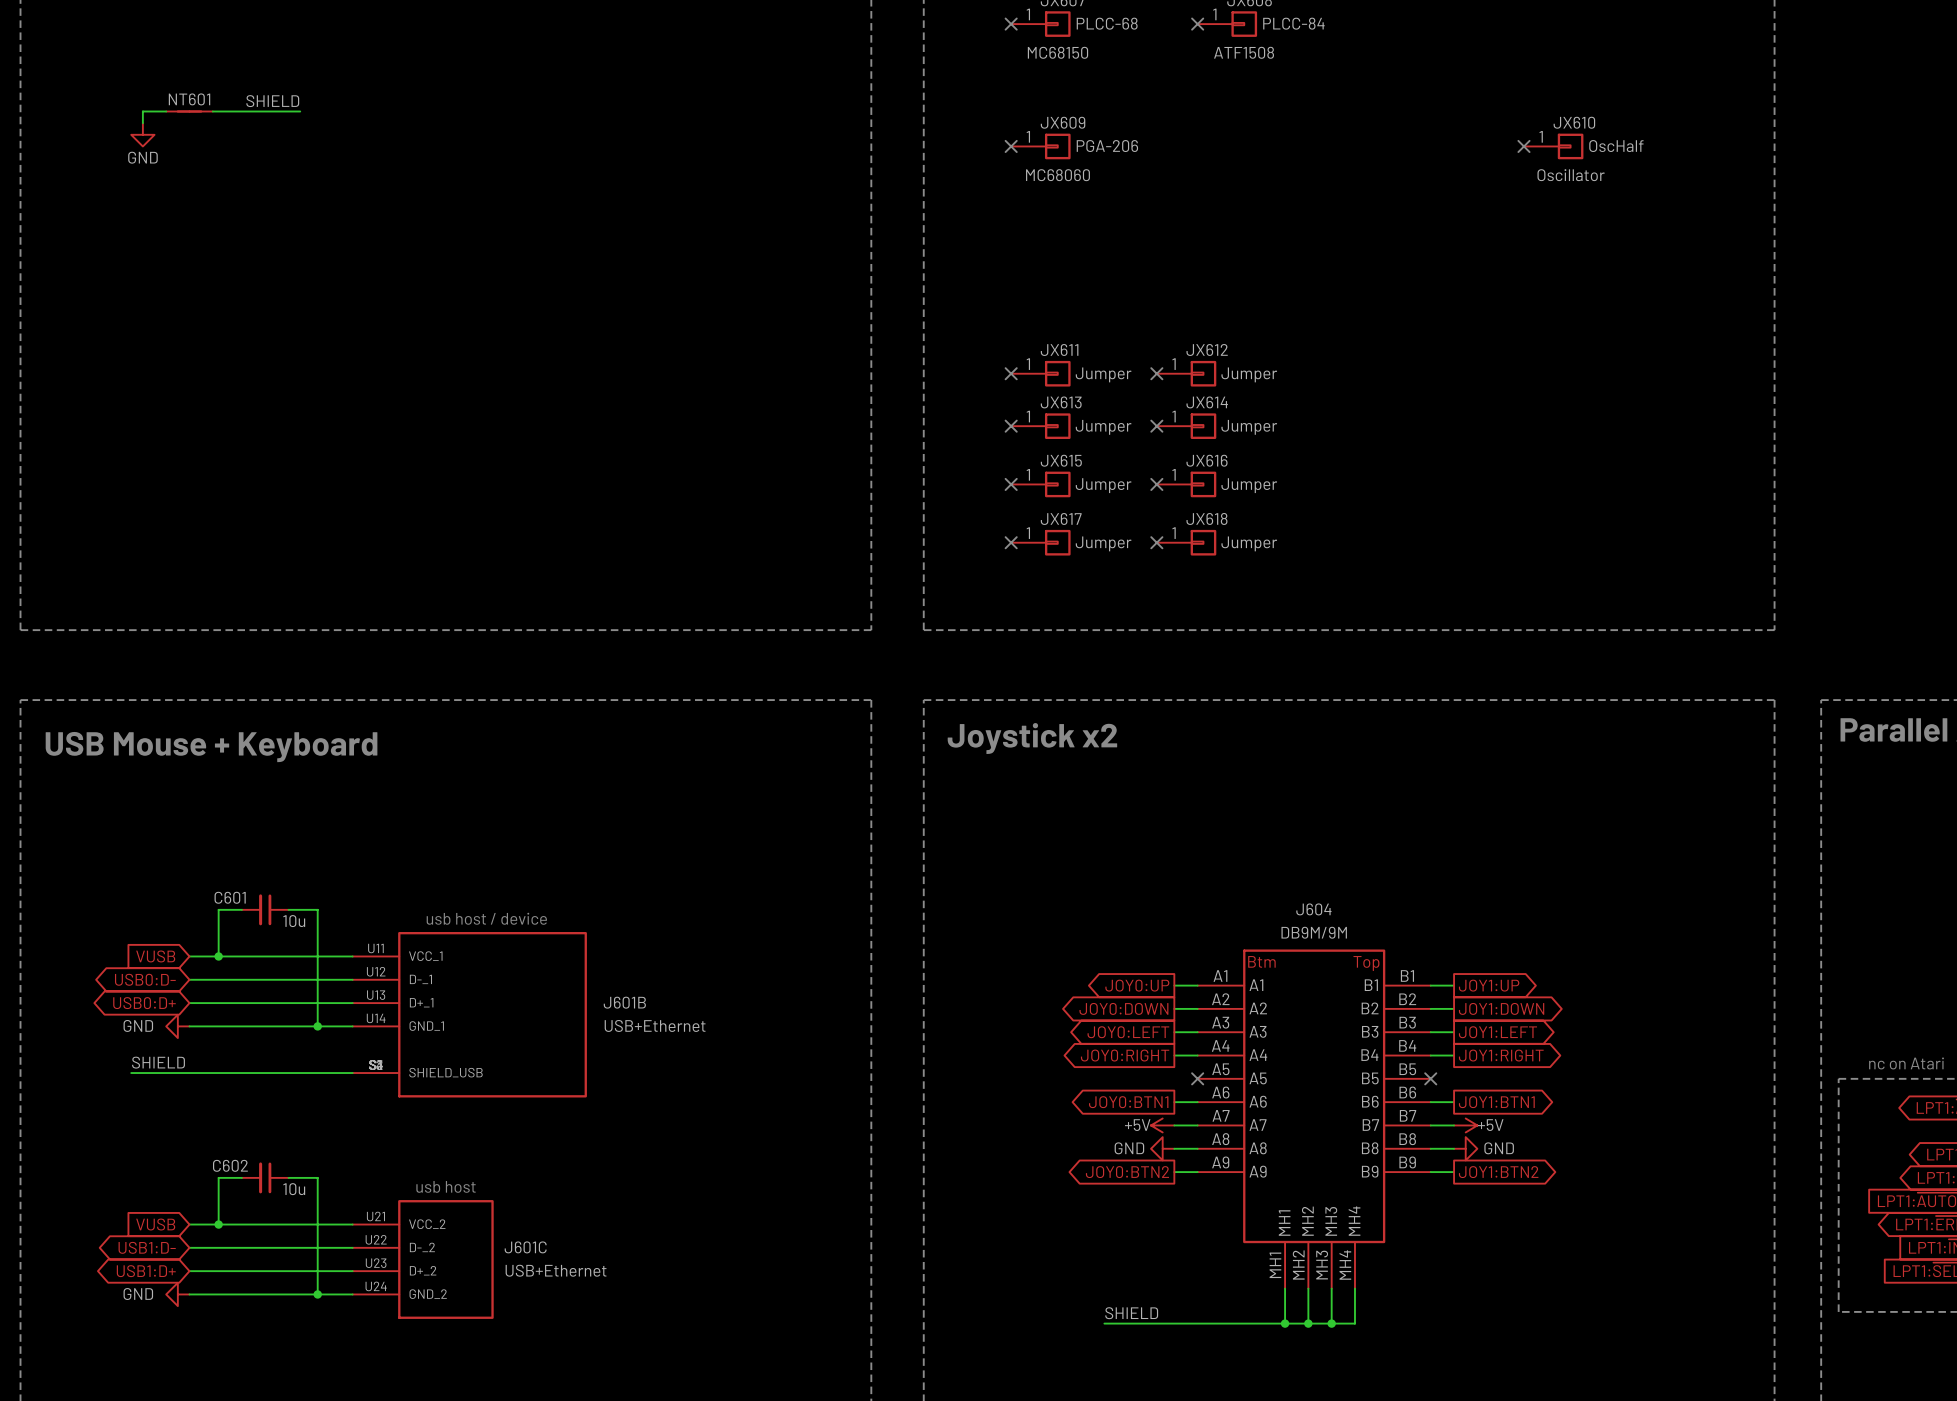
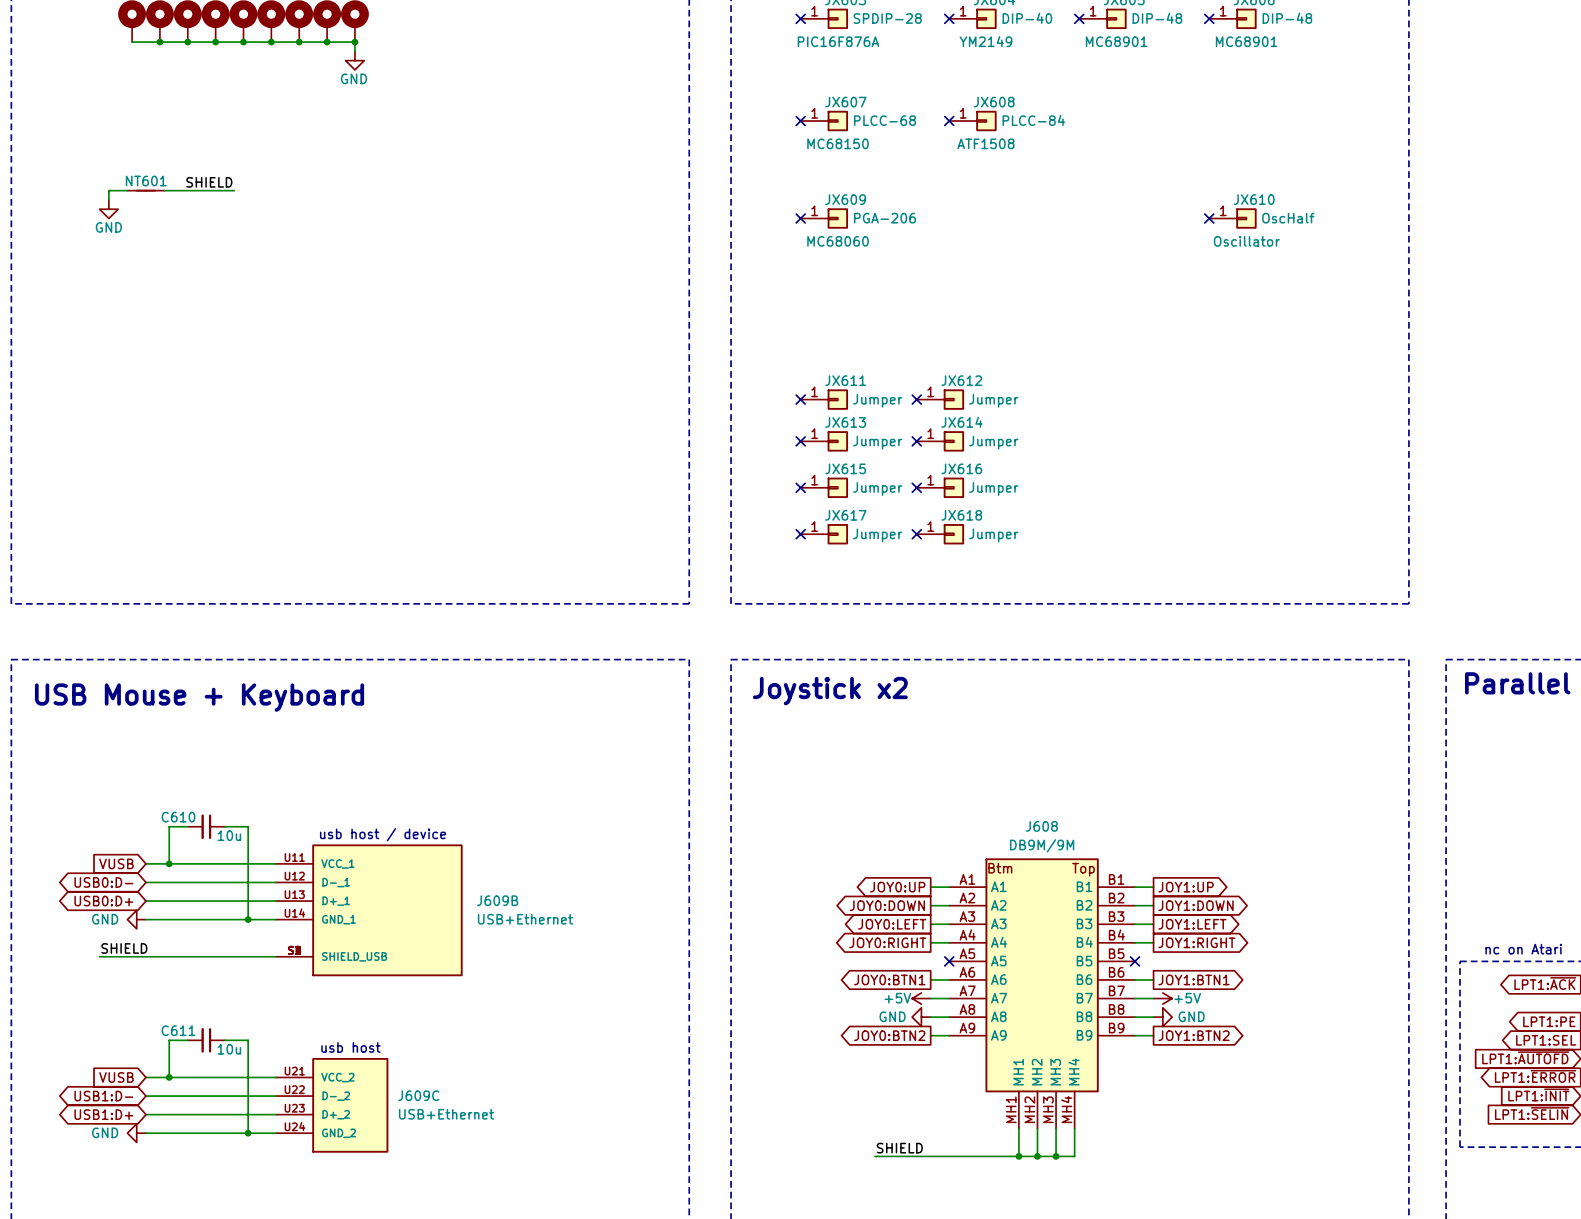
C601 name: C601 (230, 897) -> C610 (178, 817)
J604 name: J604 (1313, 909) -> J608 (1041, 826)
J601B name: J601B (624, 1002) -> J609B (497, 900)
C602 name: C602 (230, 1165) -> C611 (178, 1030)
J601C name: J601C (525, 1247) -> J609C (418, 1095)

